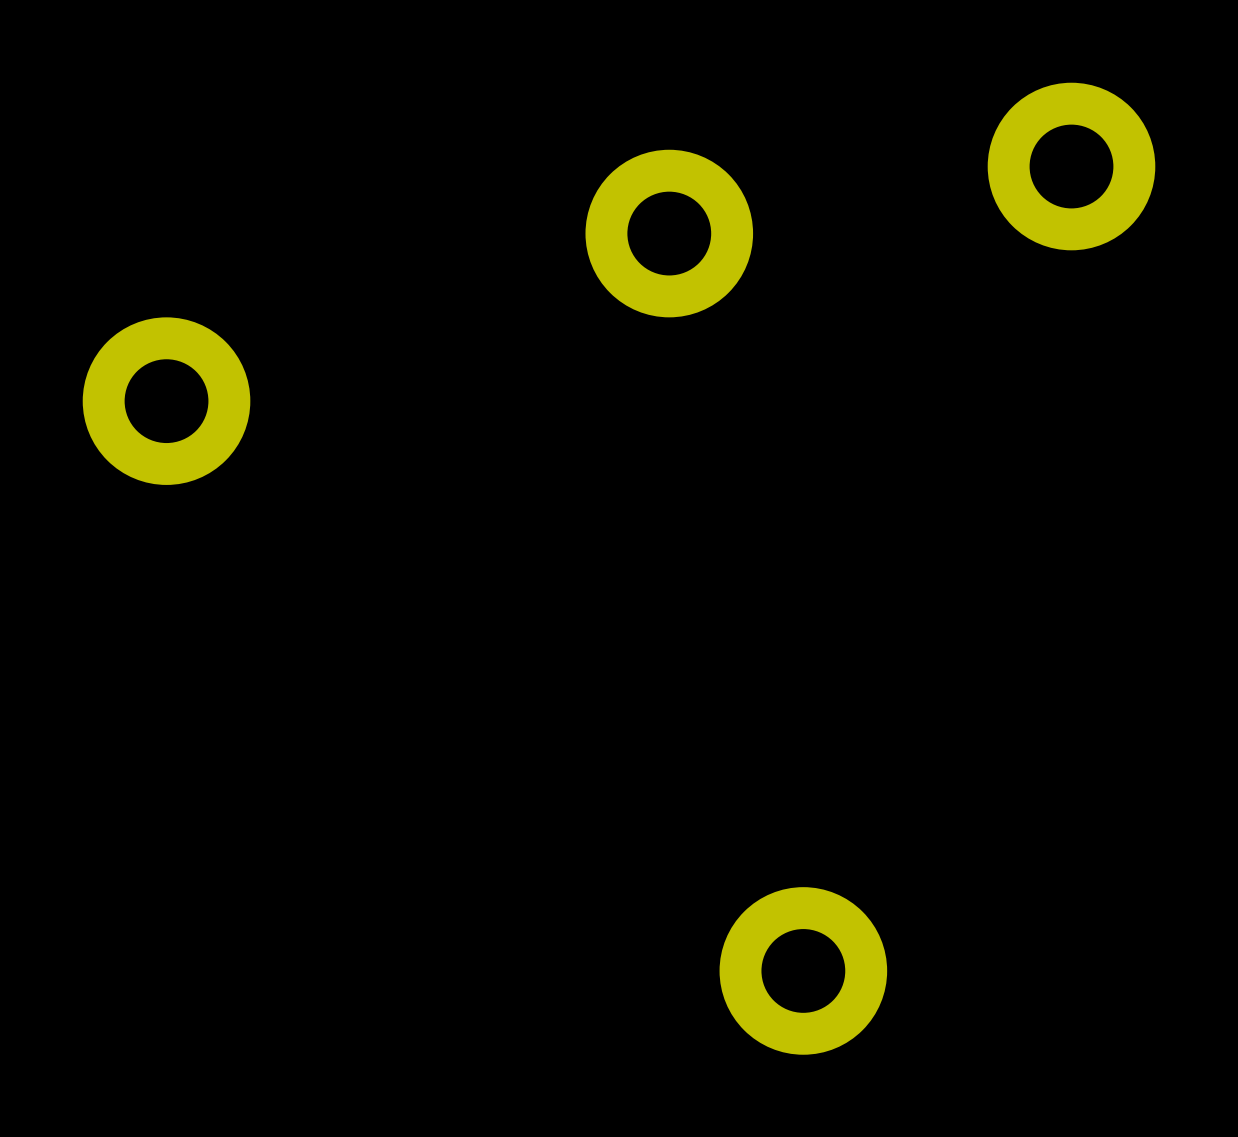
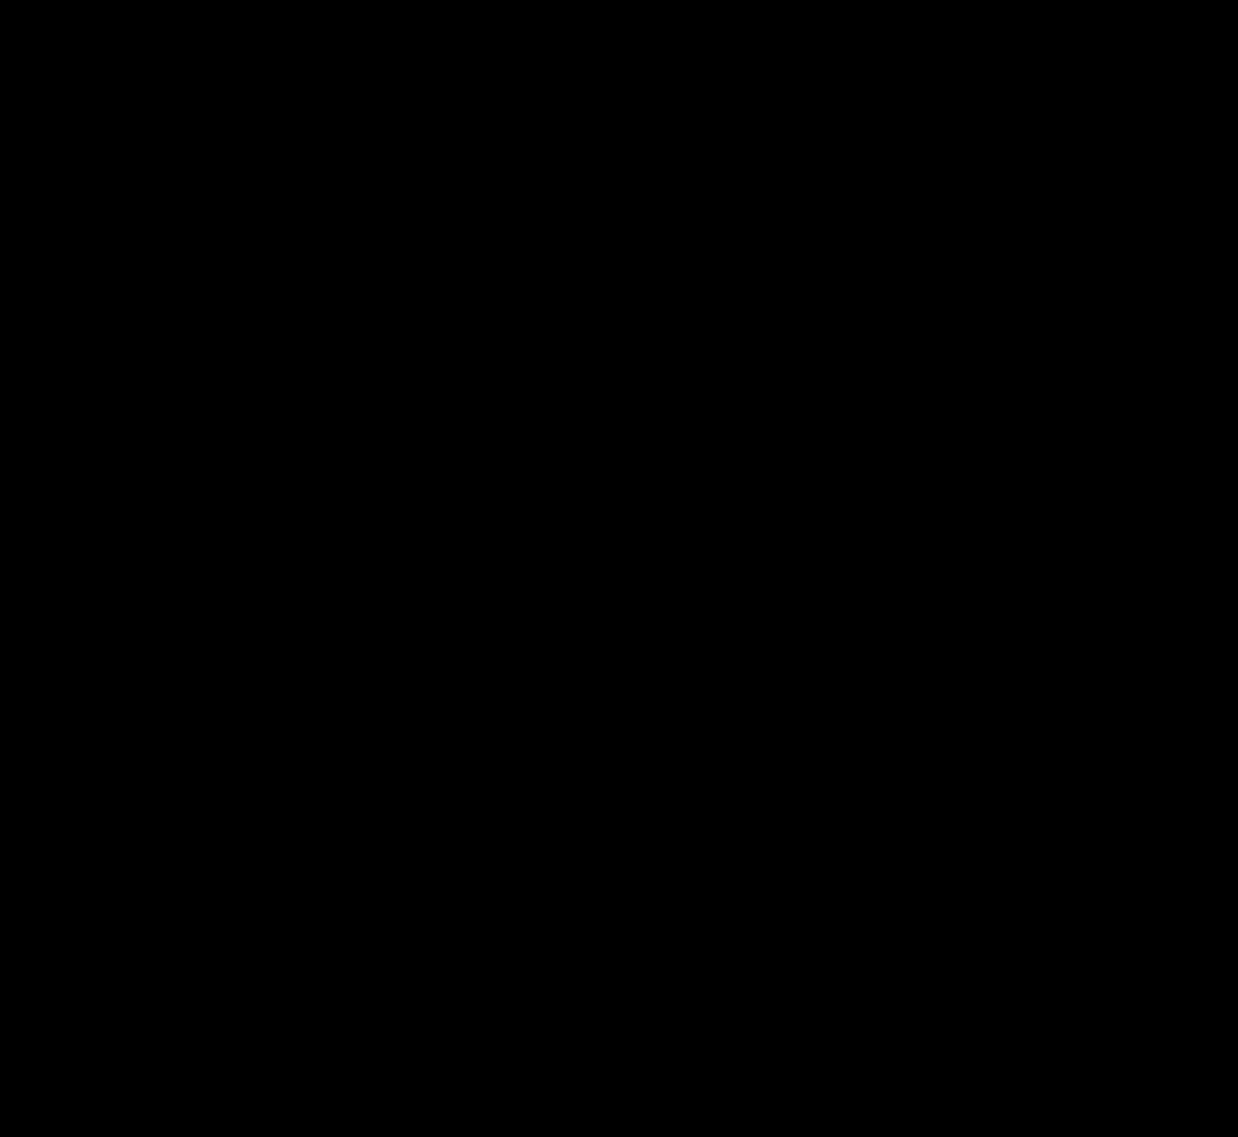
part: (1071, 166) -> none
part: (669, 233) -> none
part: (166, 401) -> none
part: (803, 970) -> none

